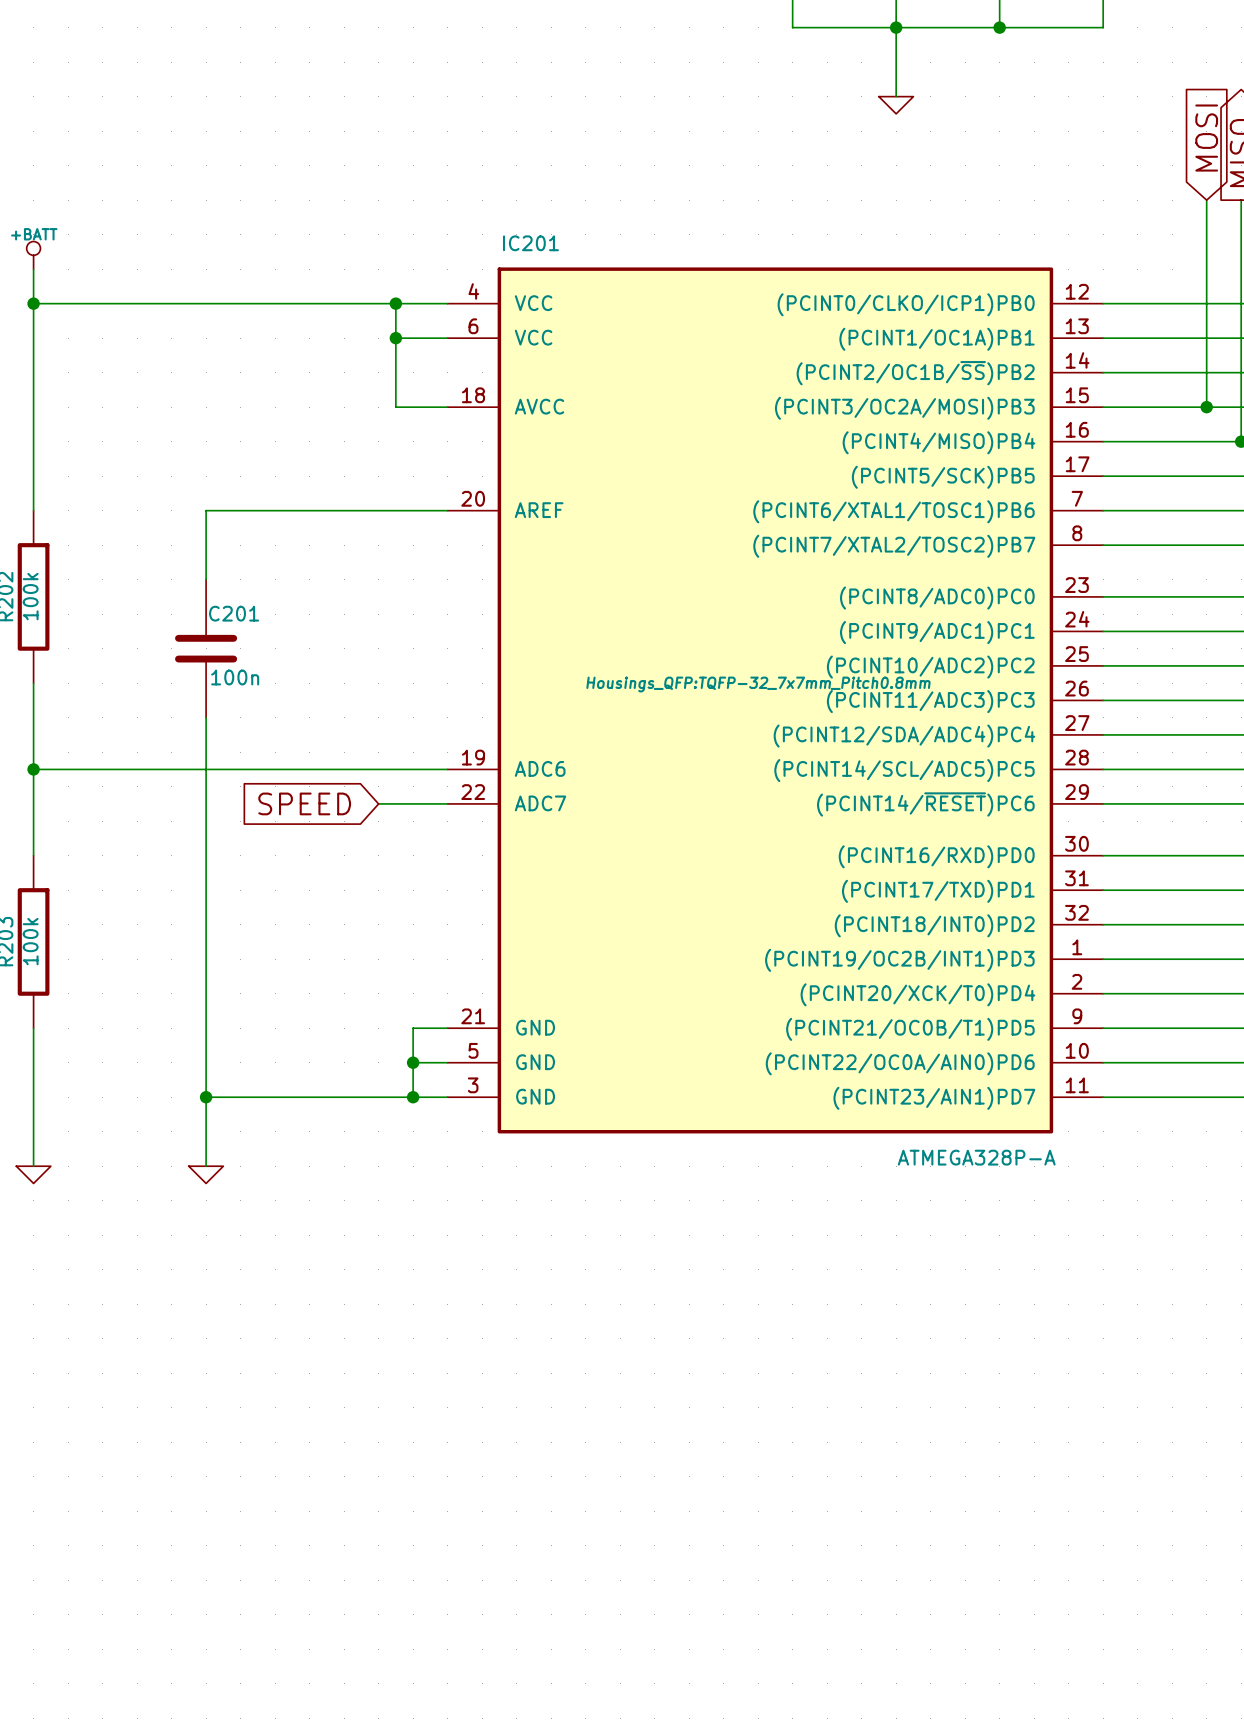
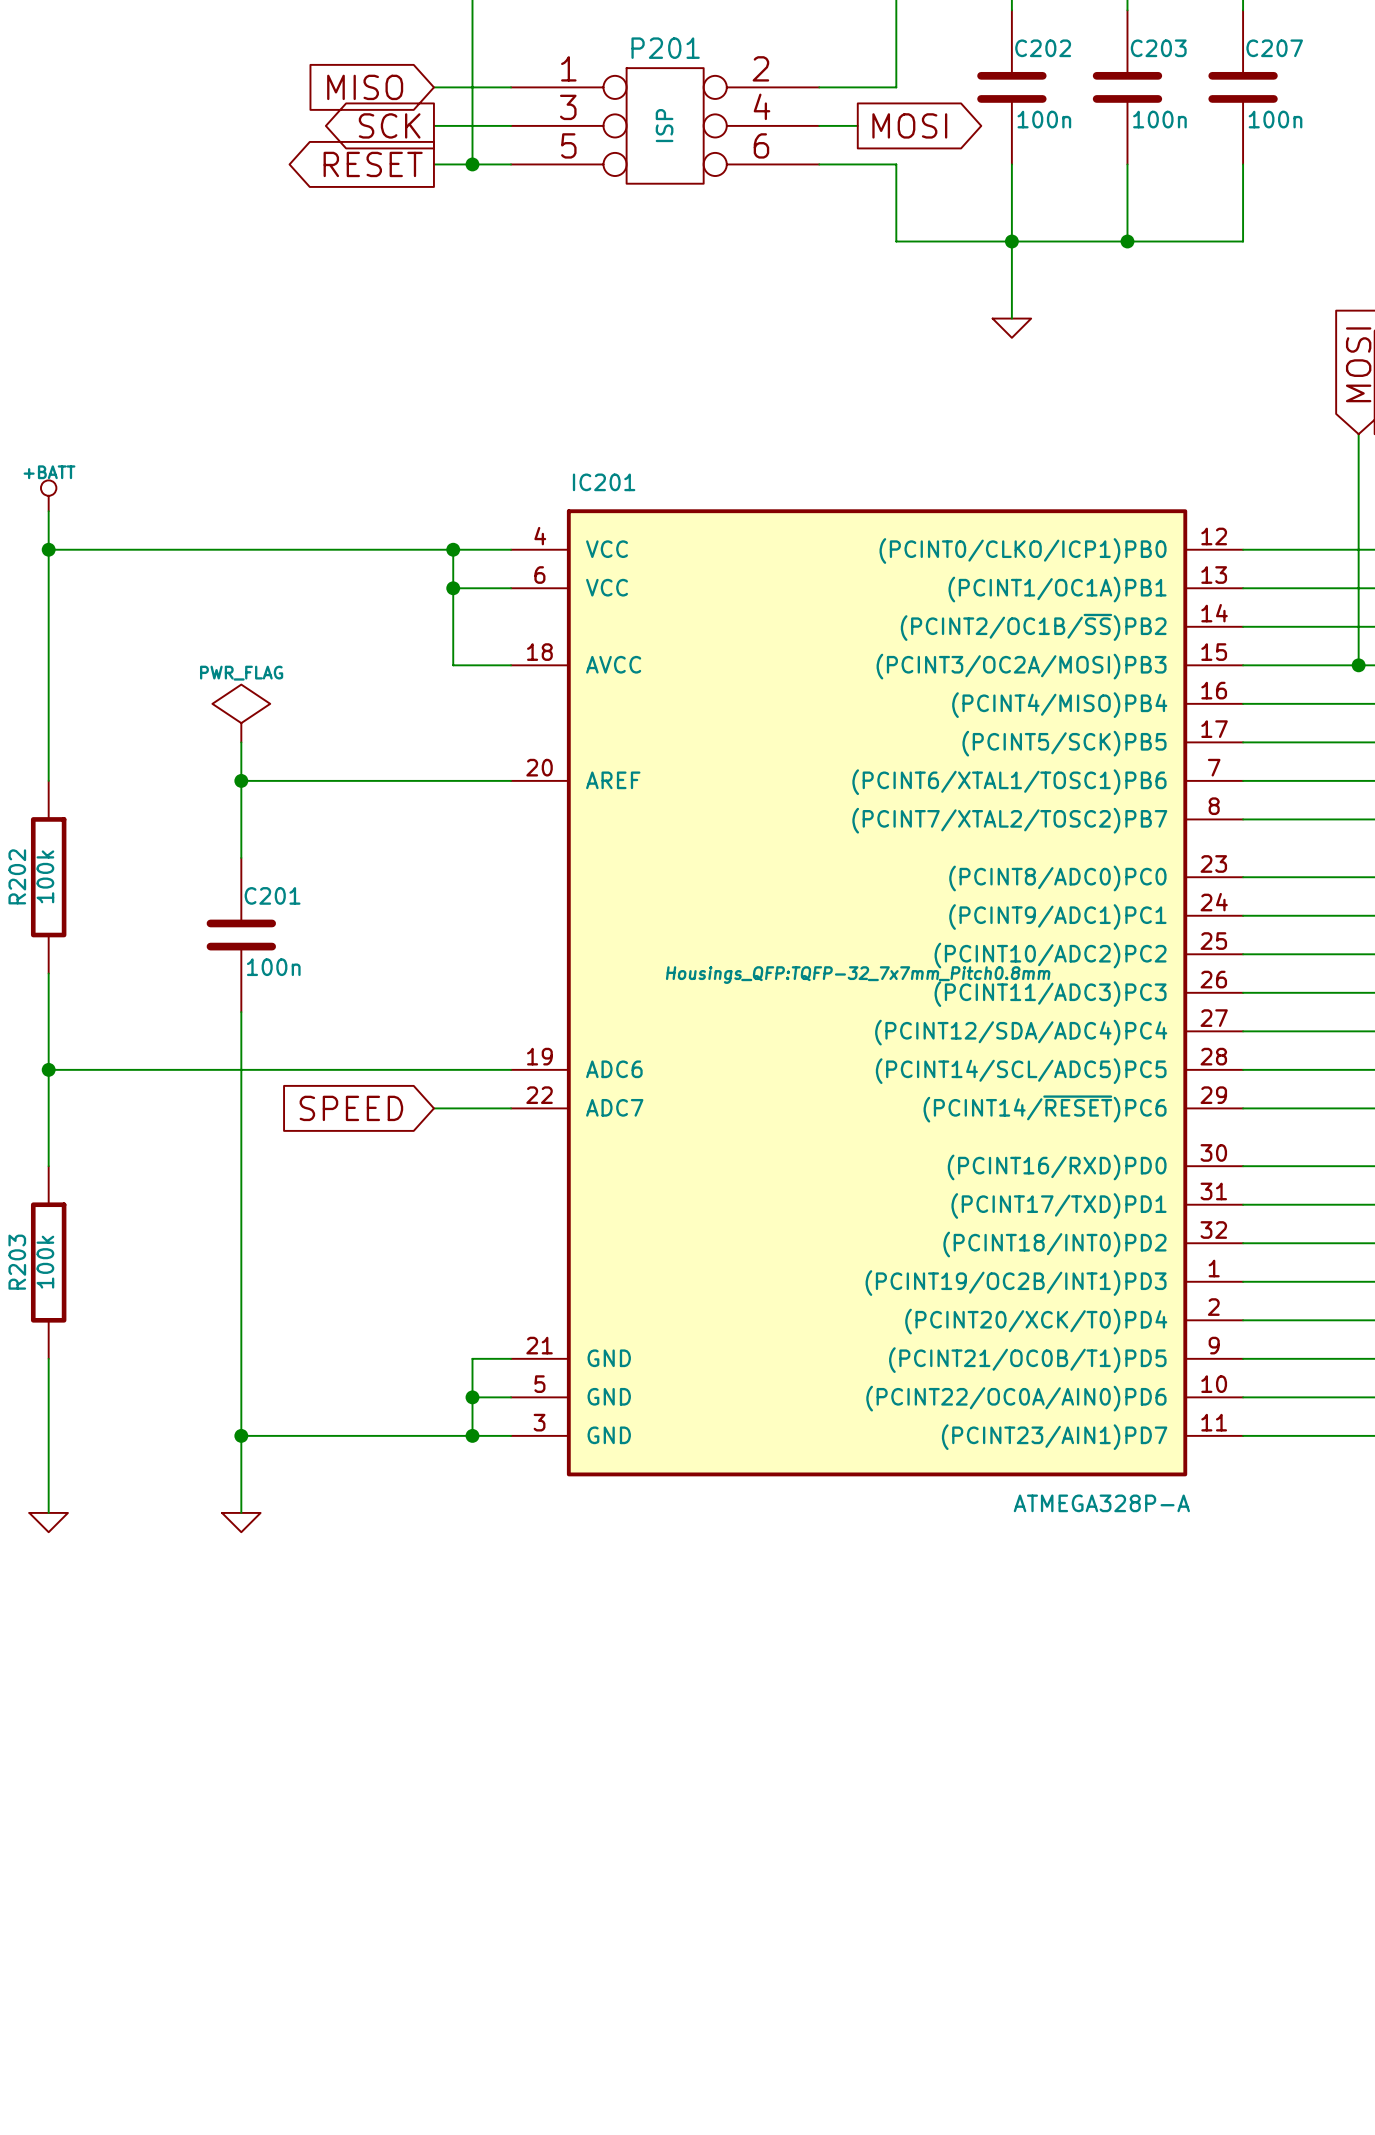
power symbol: none -> PWR_FLAG (241, 713)
wire: none -> (241, 742) (241, 780)
junction: none -> (241, 780)

